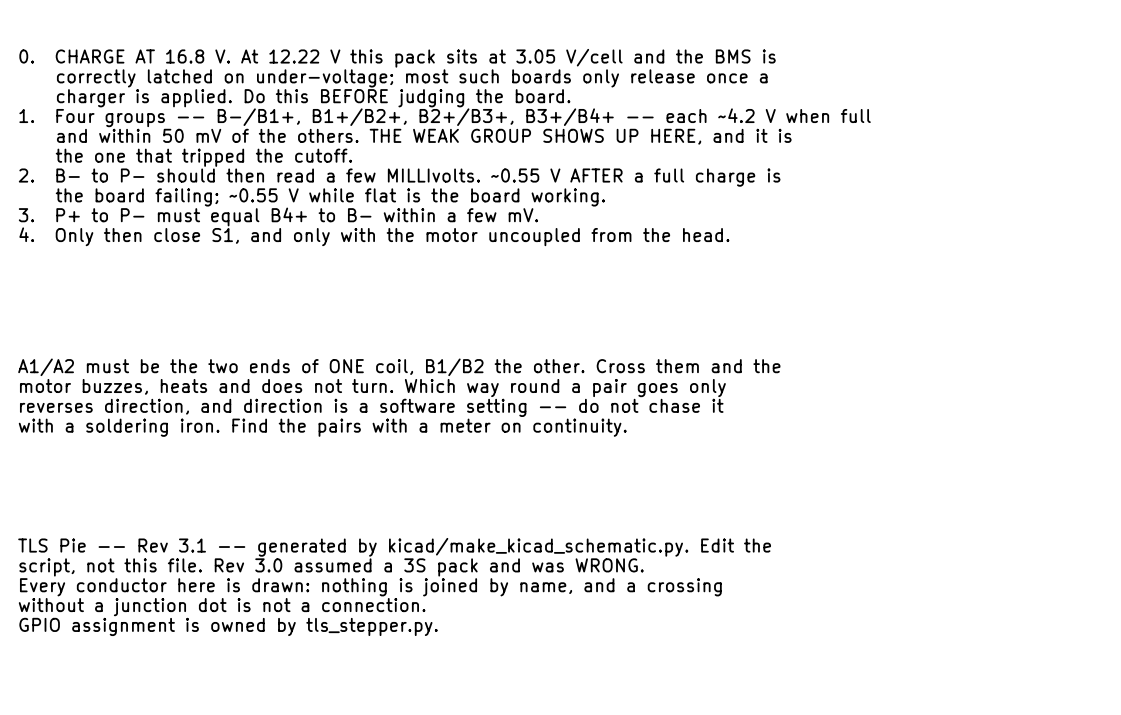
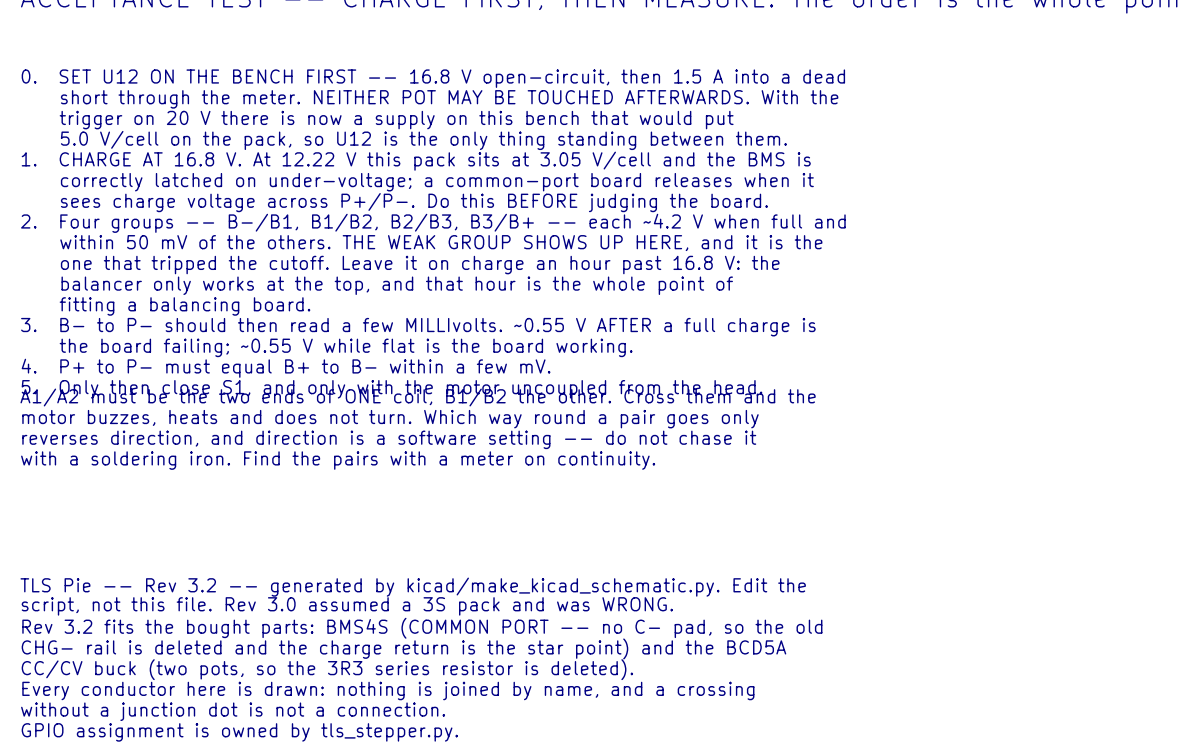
text: 0. CHARGE AT 16.8 V. At 12.22 V this pack sits at 3.05 V/cell and the BMS is (397, 58) -> 0. SET U12 ON THE BENCH FIRST -- 16.8 V open-circuit, then 1.5 A into a dead (433, 78)
text: correctly latched on under-voltage; most such boards only release once a (412, 78) -> short through the meter. NEITHER POT MAY BE TOUCHED AFTERWARDS. With the (449, 99)
text: charger is applied. Do this BEFORE judging the board. (313, 98) -> trigger on 20 V there is now a supply on this bench that would put (396, 120)
text: 1. Four groups -- B-/B1+, B1+/B2+, B2+/B3+, B3+/B4+ -- each ~4.2 V when full (445, 117) -> 5.0 V/cell on the pack, so U12 is the only thing standing between them. (423, 140)
text: and within 50 mV of the others. THE WEAK GROUP SHOWS UP HERE, and it is (424, 136) -> 1. CHARGE AT 16.8 V. At 12.22 V this pack sits at 3.05 V/cell and the BMS is (416, 161)
text: the one that tripped the cutoff. (203, 157) -> correctly latched on under-voltage; a common-port board releases when it (437, 182)
text: 2. B- to P- should then read a few MILLIvolts. ~0.55 V AFTER a full charge is (399, 177) -> sees charge voltage across P+/P-. Do this BEFORE judging the board. (414, 202)
text position: the board failing; ~0.55 V while flat is the board working. (330, 197) -> the board failing; ~0.55 V while flat is the board working. (346, 347)
text: none -> 2. Four groups -- B-/B1, B1/B2, B2/B3, B3/B+ -- each ~4.2 V when full and (433, 223)
text: 3. P+ to P- must equal B4+ to B- within a few mV. (278, 216) -> within 50 mV of the others. THE WEAK GROUP SHOWS UP HERE, and it is the (441, 243)
text: 4. Only then close S1, and only with the motor uncoupled from the head. (374, 236) -> one that tripped the cutoff. Leave it on charge an hour past 16.8 V: the (420, 265)
text: none -> balancer only works at the top, and that hour is the whole point of (397, 285)
text: none -> fitting a balancing board. (185, 306)
text: none -> 3. B- to P- should then read a few MILLIvolts. ~0.55 V AFTER a full charge is (418, 327)
text: none -> 4. P+ to P- must equal B+ to B- within a few mV. (286, 368)
text: none -> 5. Only then close S1, and only with the motor uncoupled from the head. (392, 389)
text: TLS Pie -- Rev 3.1 -- generated by kicad/make_kicad_schematic.py. Edit the (394, 547) -> TLS Pie -- Rev 3.2 -- generated by kicad/make_kicad_schematic.py. Edit the (413, 587)
text position: Every conductor here is drawn: nothing is joined by name, and a crossing (370, 587) -> Every conductor here is drawn: nothing is joined by name, and a crossing (388, 690)
text: none -> Rev 3.2 fits the bought parts: BMS4S (COMMON PORT -- no C- pad, so the old (422, 628)
text position: without a junction dot is not a connection. (222, 607) -> without a junction dot is not a connection. (233, 711)
text: none -> CHG- rail is deleted and the charge return is the star point) and the BCD5A (403, 648)
text position: GPIO assignment is owned by tls_stepper.py. (228, 626) -> GPIO assignment is owned by tls_stepper.py. (239, 732)
text: none -> CC/CV buck (two pots, so the 3R3 series resistor is deleted). (327, 669)

